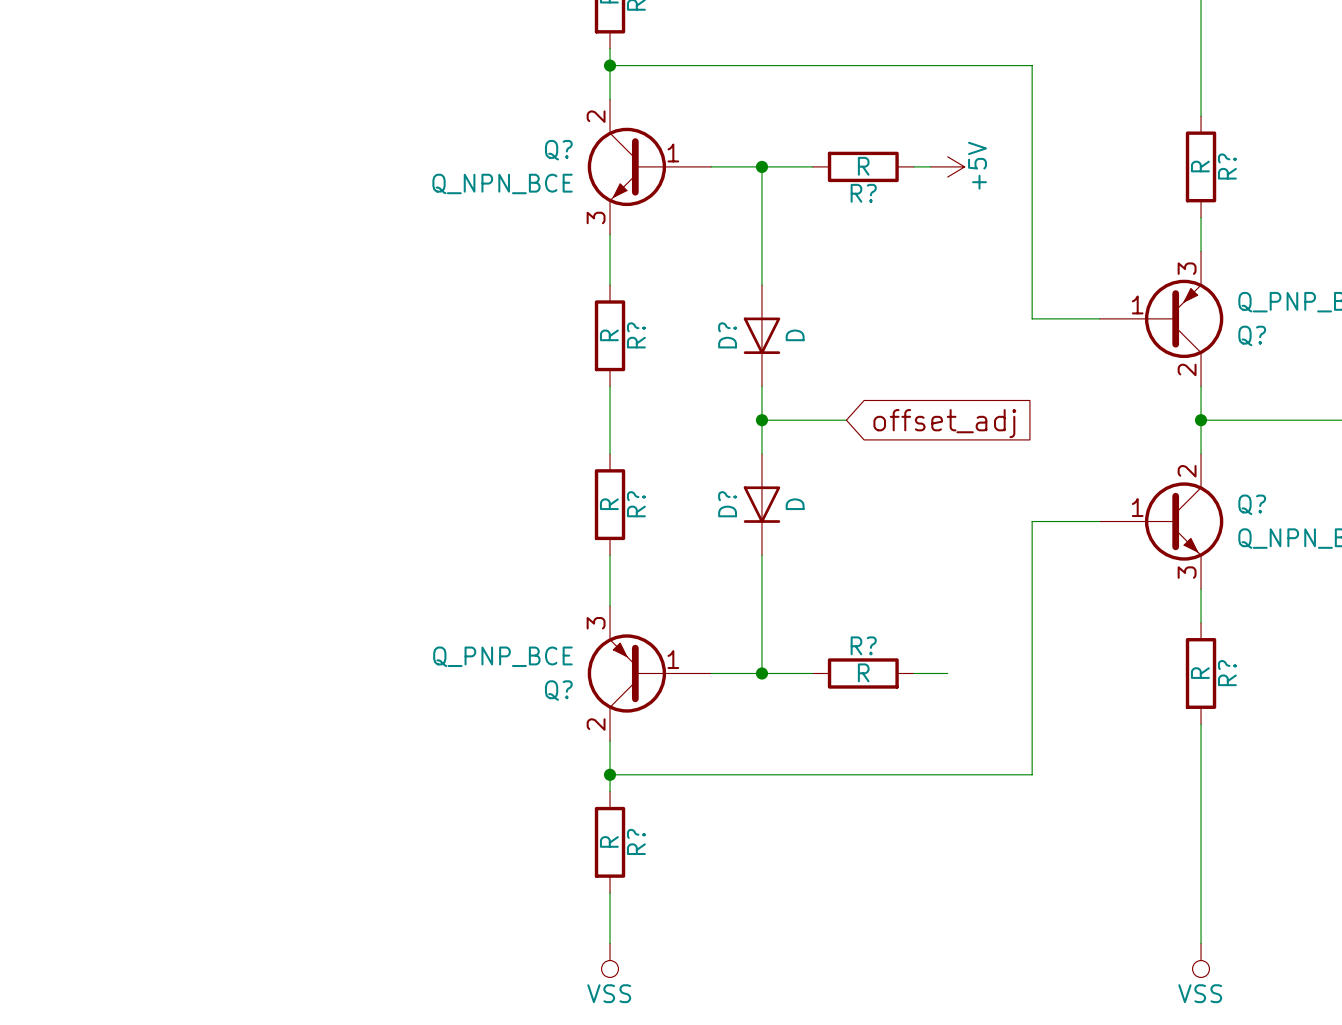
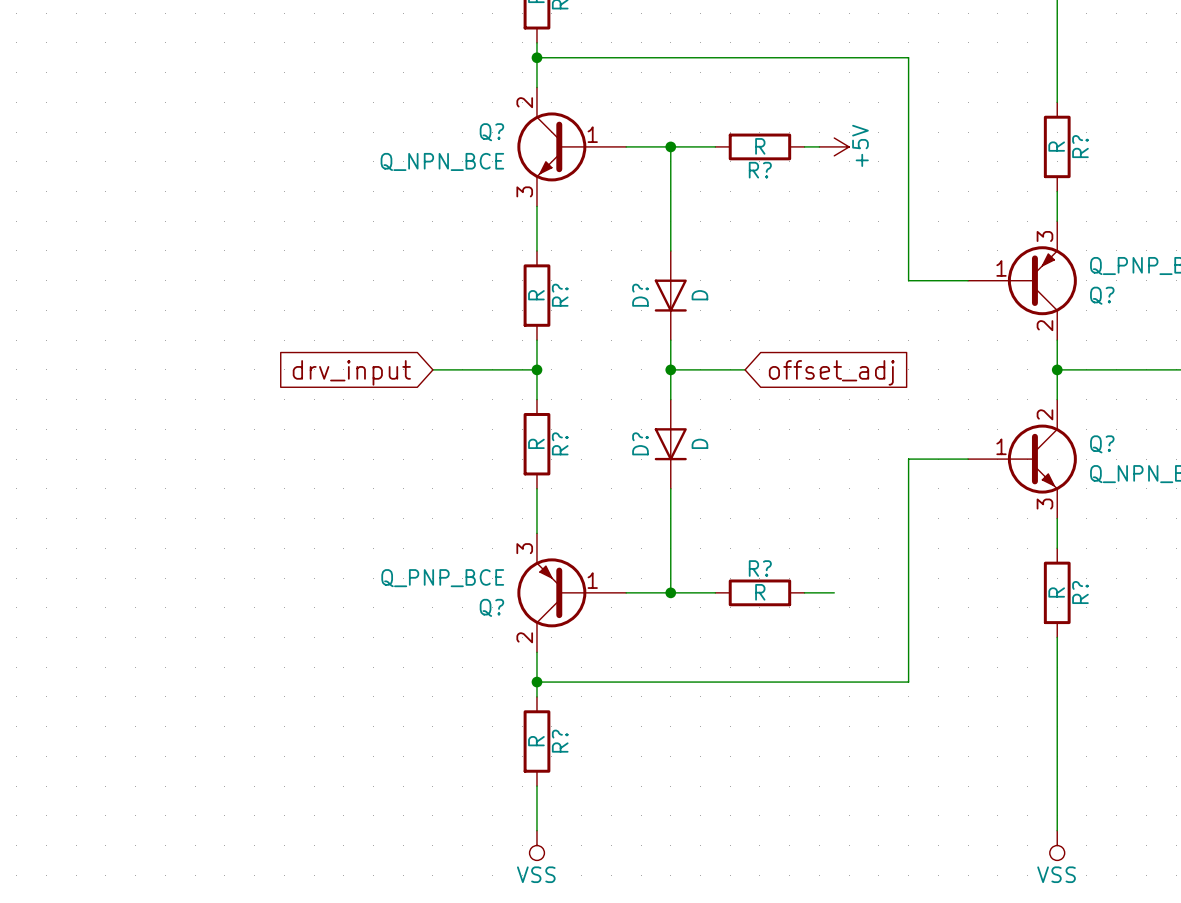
wire: none -> (432, 369) (536, 369)
junction: none -> (536, 369)
global label: none -> drv_input (351, 372)

